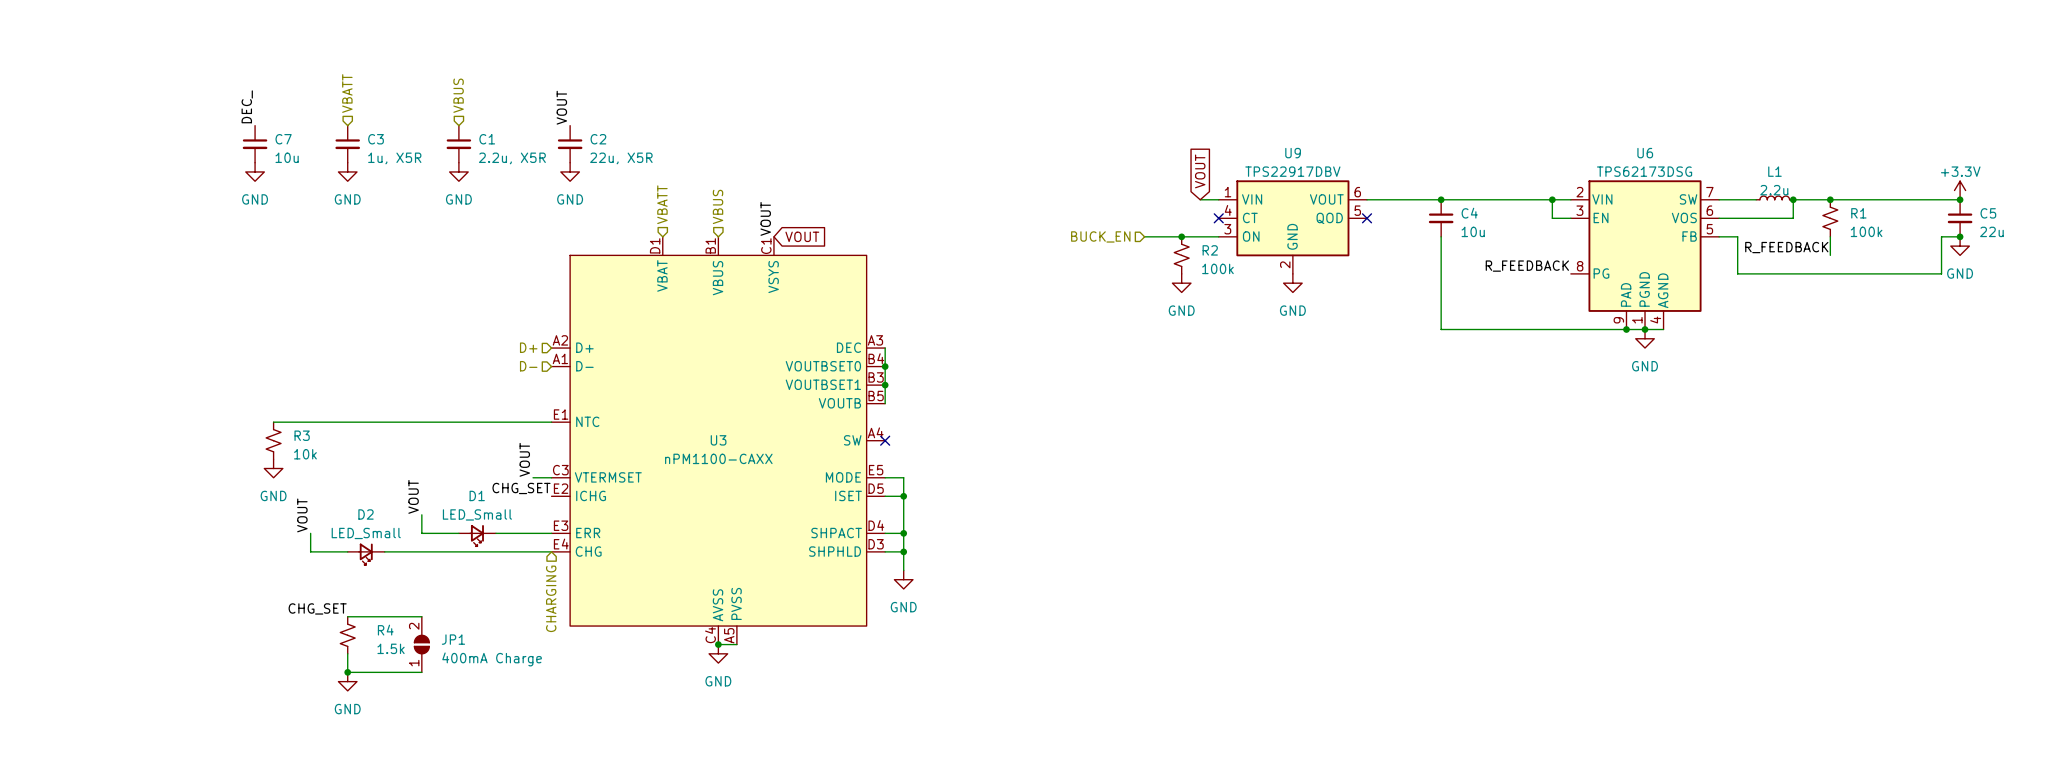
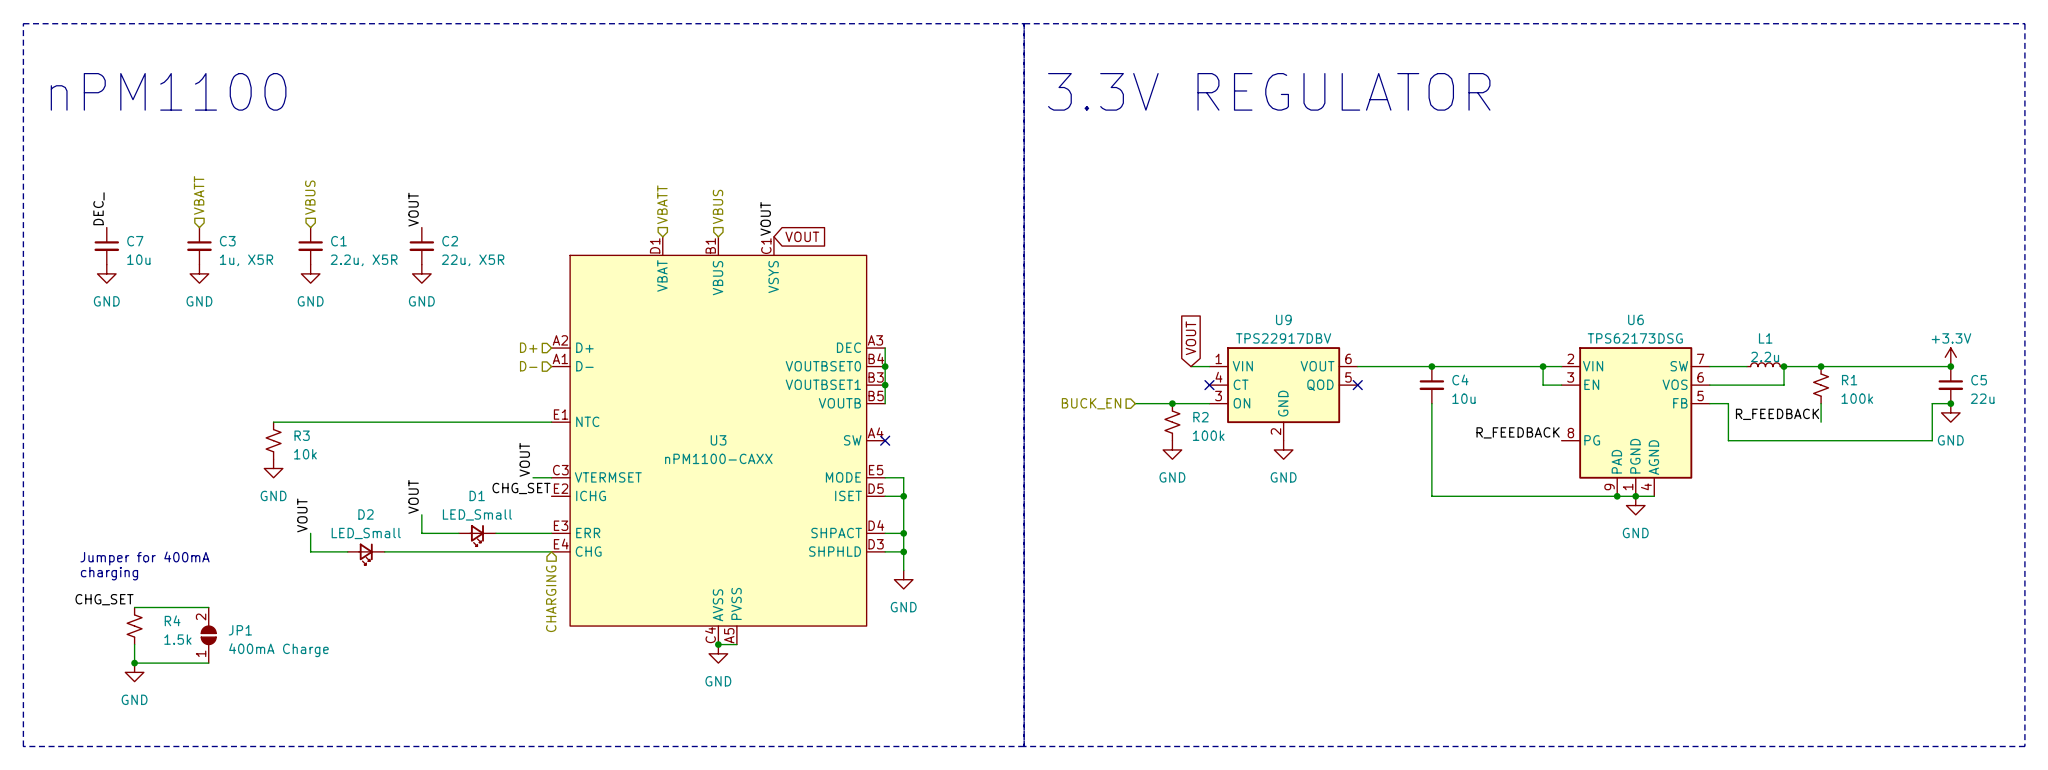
line: none -> (23, 23) (2024, 23) (2024, 746) (23, 746) (23, 23)
line: none -> (1024, 23) (1024, 746)
text: none -> nPM1100 (168, 91)
text: none -> 3.3V REGULATOR (1269, 91)
hierarchical label position: VBATT (347, 93) -> VBATT (199, 195)
hierarchical label position: VBUS (458, 95) -> VBUS (310, 197)
label position: DEC_ (247, 106) -> DEC_ (98, 208)
label position: VOUT (561, 107) -> VOUT (413, 209)
C7 position: (255, 144) -> (106, 246)
C3 position: (347, 144) -> (199, 246)
C1 position: (458, 144) -> (310, 246)
C2 position: (570, 144) -> (421, 246)
power symbol: GND (255, 171) -> none
power symbol: GND (347, 171) -> none
power symbol: GND (458, 171) -> none
power symbol: GND (570, 171) -> none
global label position: VOUT (1200, 171) -> VOUT (1190, 338)
power symbol position: +3.3V (1960, 190) -> +3.3V (1950, 357)
L1 position: (1774, 197) -> (1765, 364)
wire: (1200, 199) (1218, 199) -> (1190, 366) (1209, 366)
wire: (1367, 199) (1570, 199) -> (1357, 366) (1561, 366)
junction: (1441, 199) -> none
wire: (1552, 199) (1552, 218) (1570, 218) -> (1543, 366) (1543, 385) (1561, 385)
junction: (1552, 199) -> none
wire: (1719, 199) (1756, 199) -> (1709, 366) (1746, 366)
junction: (1793, 199) -> none
junction: (1830, 199) -> none
wire: (1960, 199) (1793, 199) (1793, 218) (1719, 218) -> (1950, 366) (1784, 366) (1784, 385) (1709, 385)
junction: (1960, 199) -> none
no-connect mark: (1218, 218) -> none
no-connect mark: (1367, 218) -> none
C4 position: (1441, 218) -> (1431, 385)
R1 position: (1830, 218) -> (1821, 385)
C5 position: (1960, 218) -> (1950, 385)
U9 position: (1292, 227) -> (1283, 393)
hierarchical label position: BUCK_EN (1100, 236) -> BUCK_EN (1091, 403)
wire: (1144, 236) (1218, 236) -> (1135, 403) (1209, 403)
junction: (1181, 236) -> none
wire: (1441, 236) (1441, 329) (1663, 329) -> (1431, 403) (1431, 496) (1654, 496)
wire: (1719, 236) (1737, 236) (1737, 273) (1941, 273) (1941, 236) (1960, 236) -> (1709, 403) (1728, 403) (1728, 440) (1932, 440) (1932, 403) (1950, 403)
wire: (1830, 236) (1830, 255) -> (1821, 403) (1821, 422)
junction: (1960, 236) -> none
power symbol: GND (1960, 246) -> none
label: R_FEEDBACK (1786, 247) -> none
U6 position: (1645, 254) -> (1635, 421)
R2 position: (1181, 255) -> (1172, 422)
label: R_FEEDBACK (1527, 266) -> none
power symbol: none -> GND (106, 273)
power symbol: none -> GND (199, 273)
power symbol: none -> GND (310, 273)
power symbol: none -> GND (421, 273)
power symbol: GND (1181, 283) -> none
power symbol: GND (1292, 283) -> none
junction: (1626, 329) -> none
junction: (1645, 329) -> none
power symbol: GND (1645, 338) -> none
junction: none -> (1431, 366)
junction: none -> (1543, 366)
junction: none -> (1784, 366)
junction: none -> (1821, 366)
junction: none -> (1950, 366)
no-connect mark: none -> (1209, 385)
no-connect mark: none -> (1357, 385)
junction: none -> (1172, 403)
junction: none -> (1950, 403)
power symbol: none -> GND (1950, 412)
label: none -> R_FEEDBACK (1777, 414)
label: none -> R_FEEDBACK (1518, 432)
power symbol: none -> GND (1172, 449)
power symbol: none -> GND (1283, 449)
junction: none -> (1617, 496)
junction: none -> (1635, 496)
power symbol: none -> GND (1635, 505)
text: none -> Jumper for 400mA (145, 558)
text: none -> charging (109, 573)
label: none -> CHG_SET (104, 599)
wire: none -> (134, 607) (208, 607)
label: CHG_SET (317, 608) -> none
wire: (347, 616) (421, 616) -> none
R4 position: (347, 635) -> (134, 626)
wire: none -> (134, 644) (134, 663) (208, 663)
JP1 position: (421, 644) -> (208, 635)
wire: (347, 653) (347, 672) (421, 672) -> none
junction: none -> (134, 663)
power symbol: none -> GND (134, 672)
junction: (347, 672) -> none
power symbol: GND (347, 681) -> none

